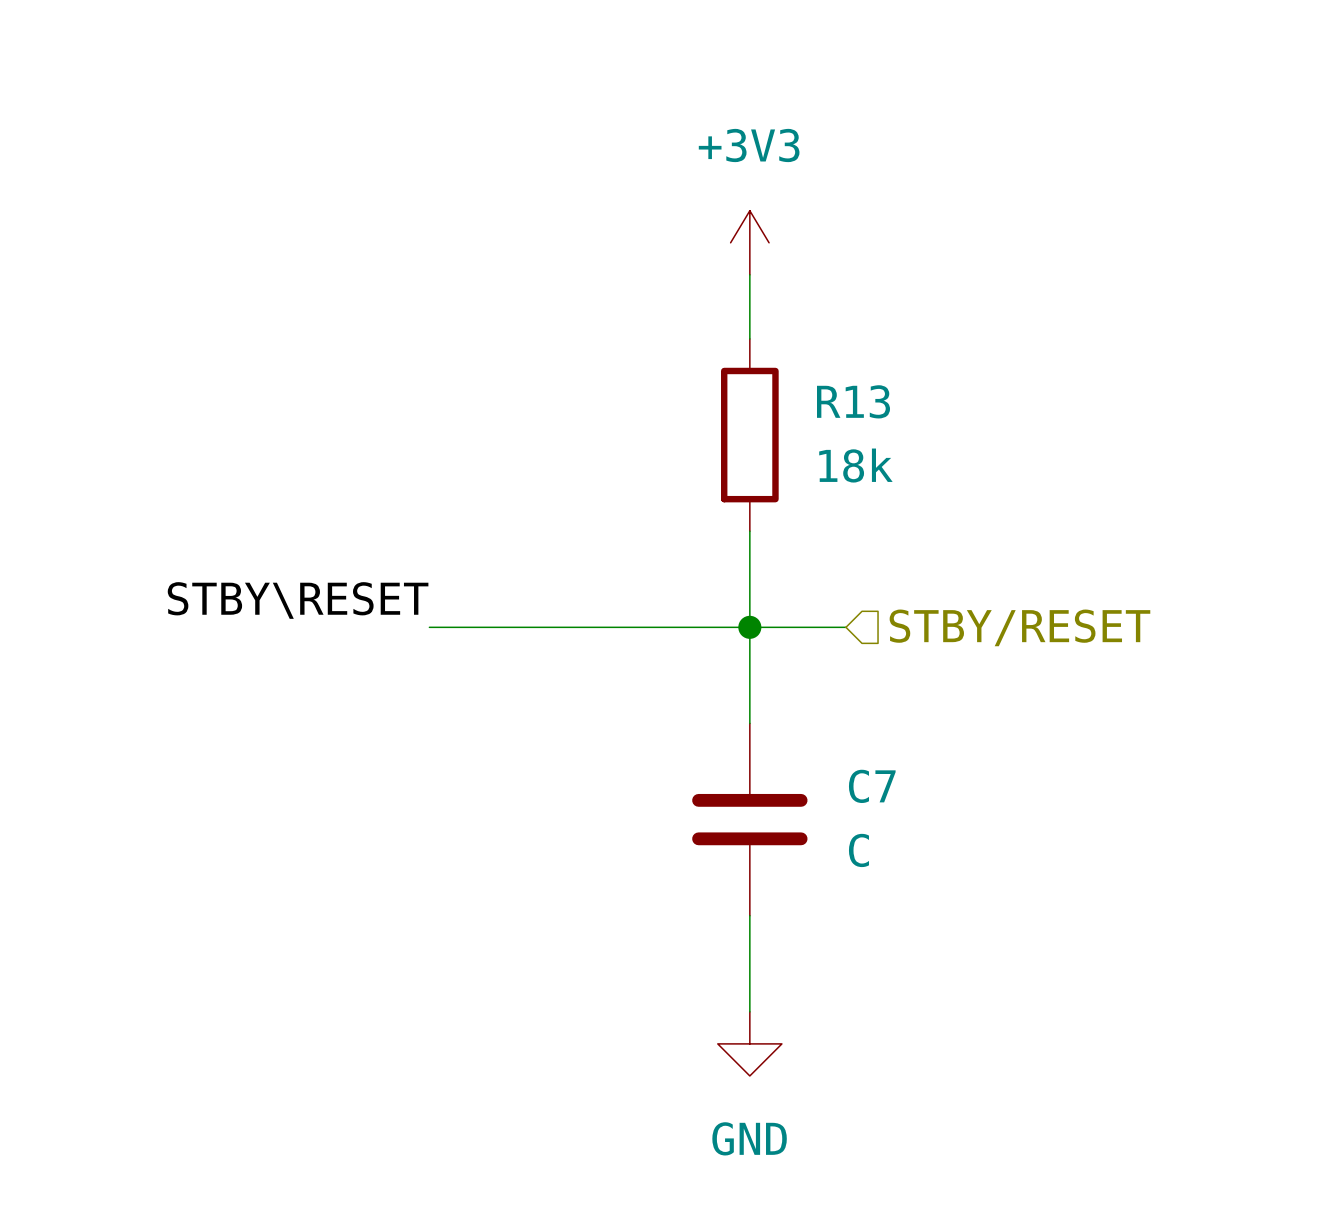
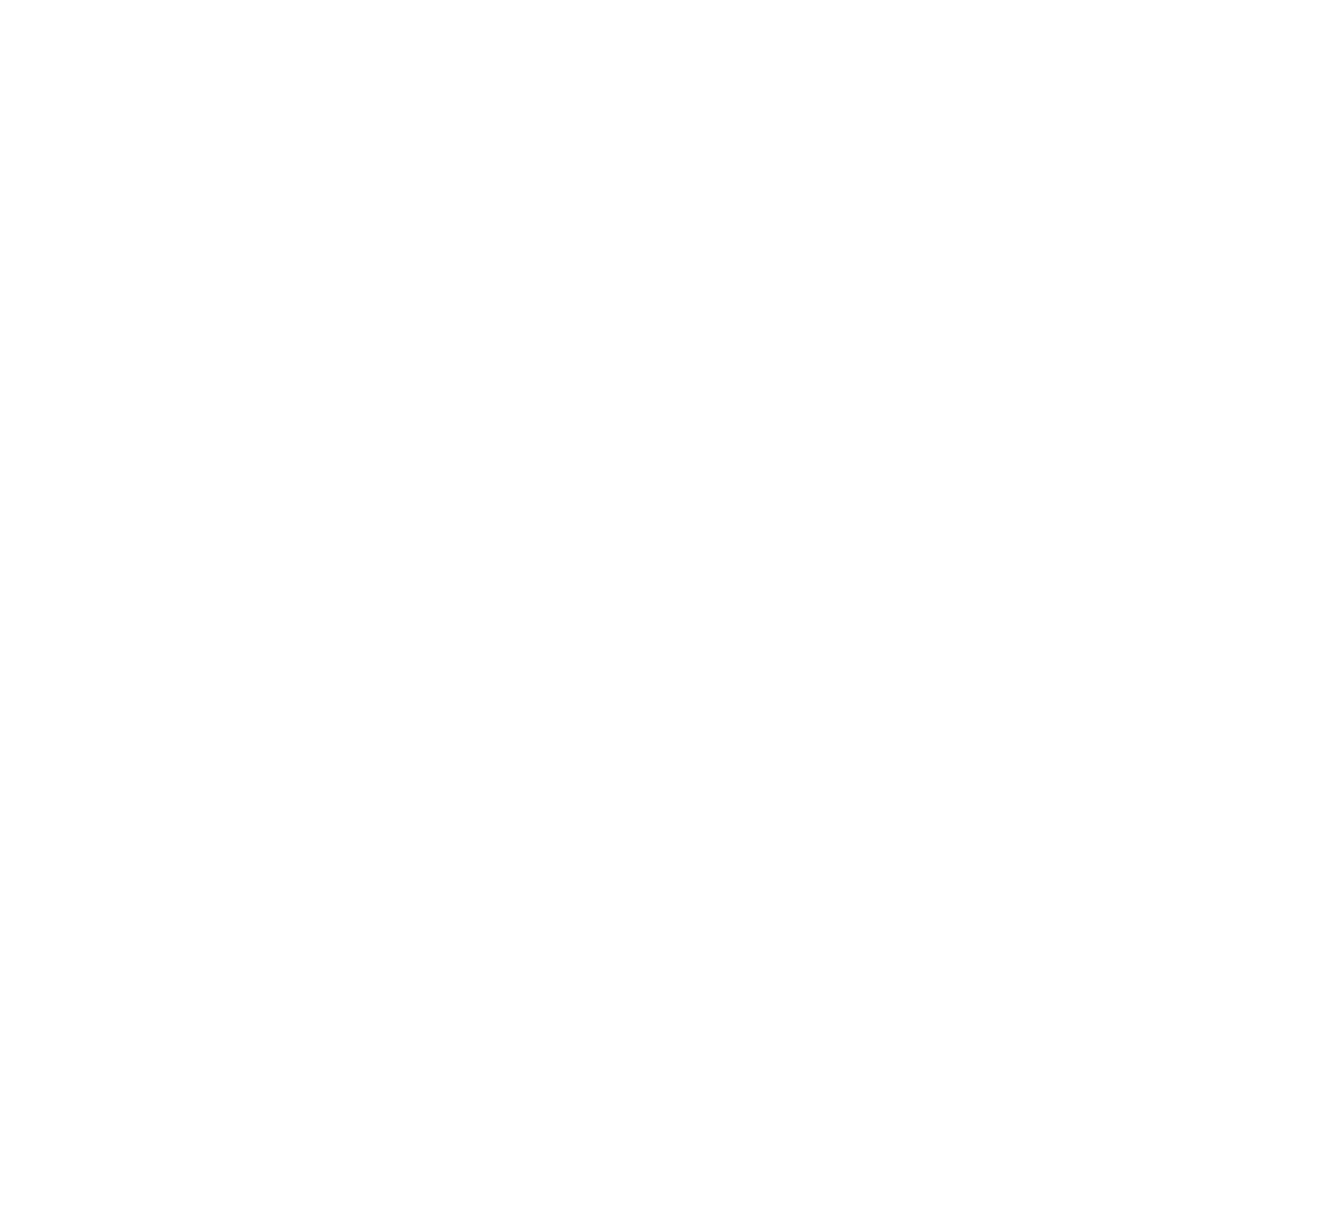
power symbol: +3V3 (749, 242) -> none
wire: (749, 274) (749, 338) -> none
R13: 18k (749, 435) -> none
wire: (749, 531) (749, 723) -> none
label: STBY\RESET (298, 600) -> none
wire: (429, 627) (845, 627) -> none
junction: (749, 627) -> none
hierarchical label: STBY/RESET (1019, 627) -> none
C7: C (749, 819) -> none
wire: (749, 915) (749, 1011) -> none
power symbol: GND (749, 1043) -> none

